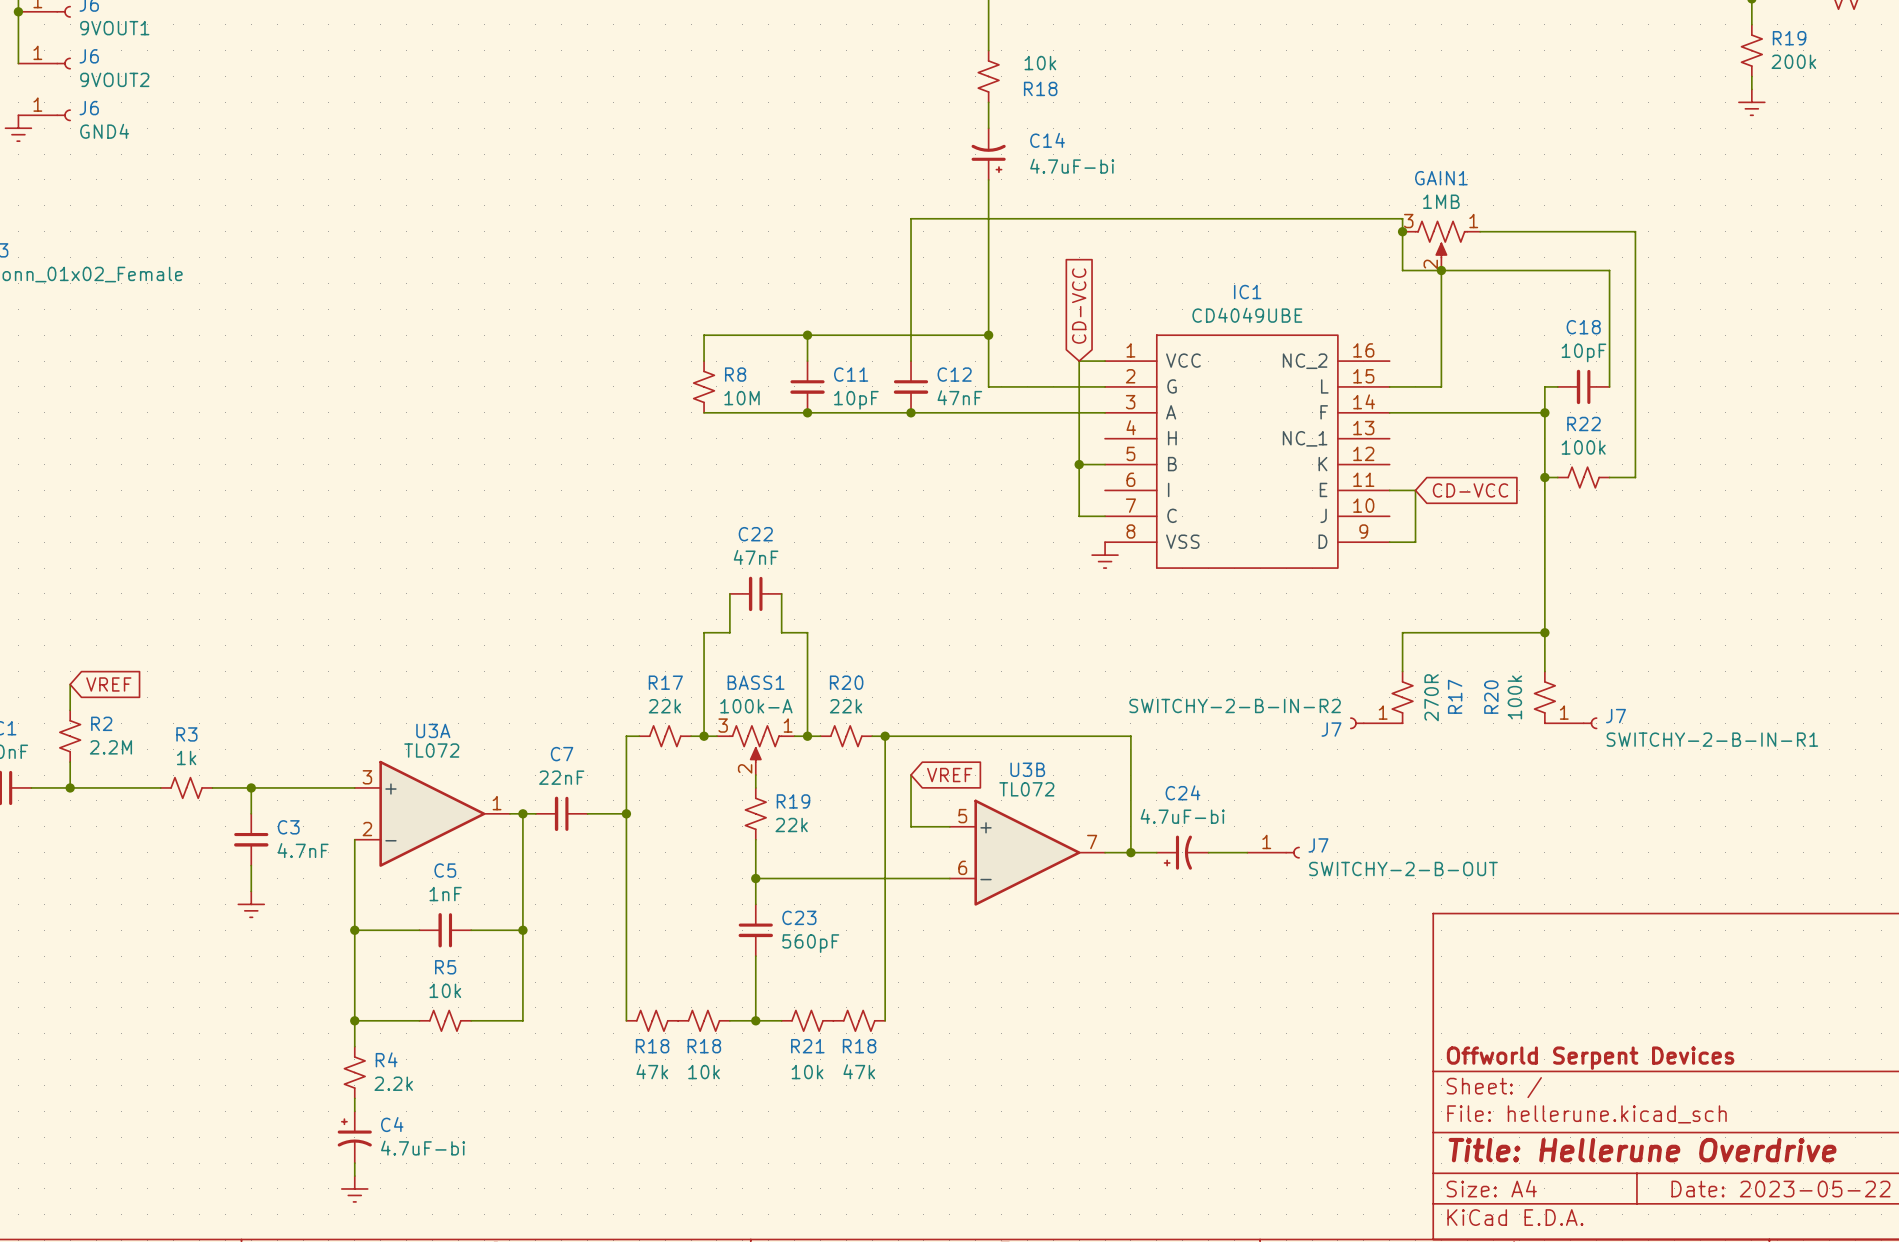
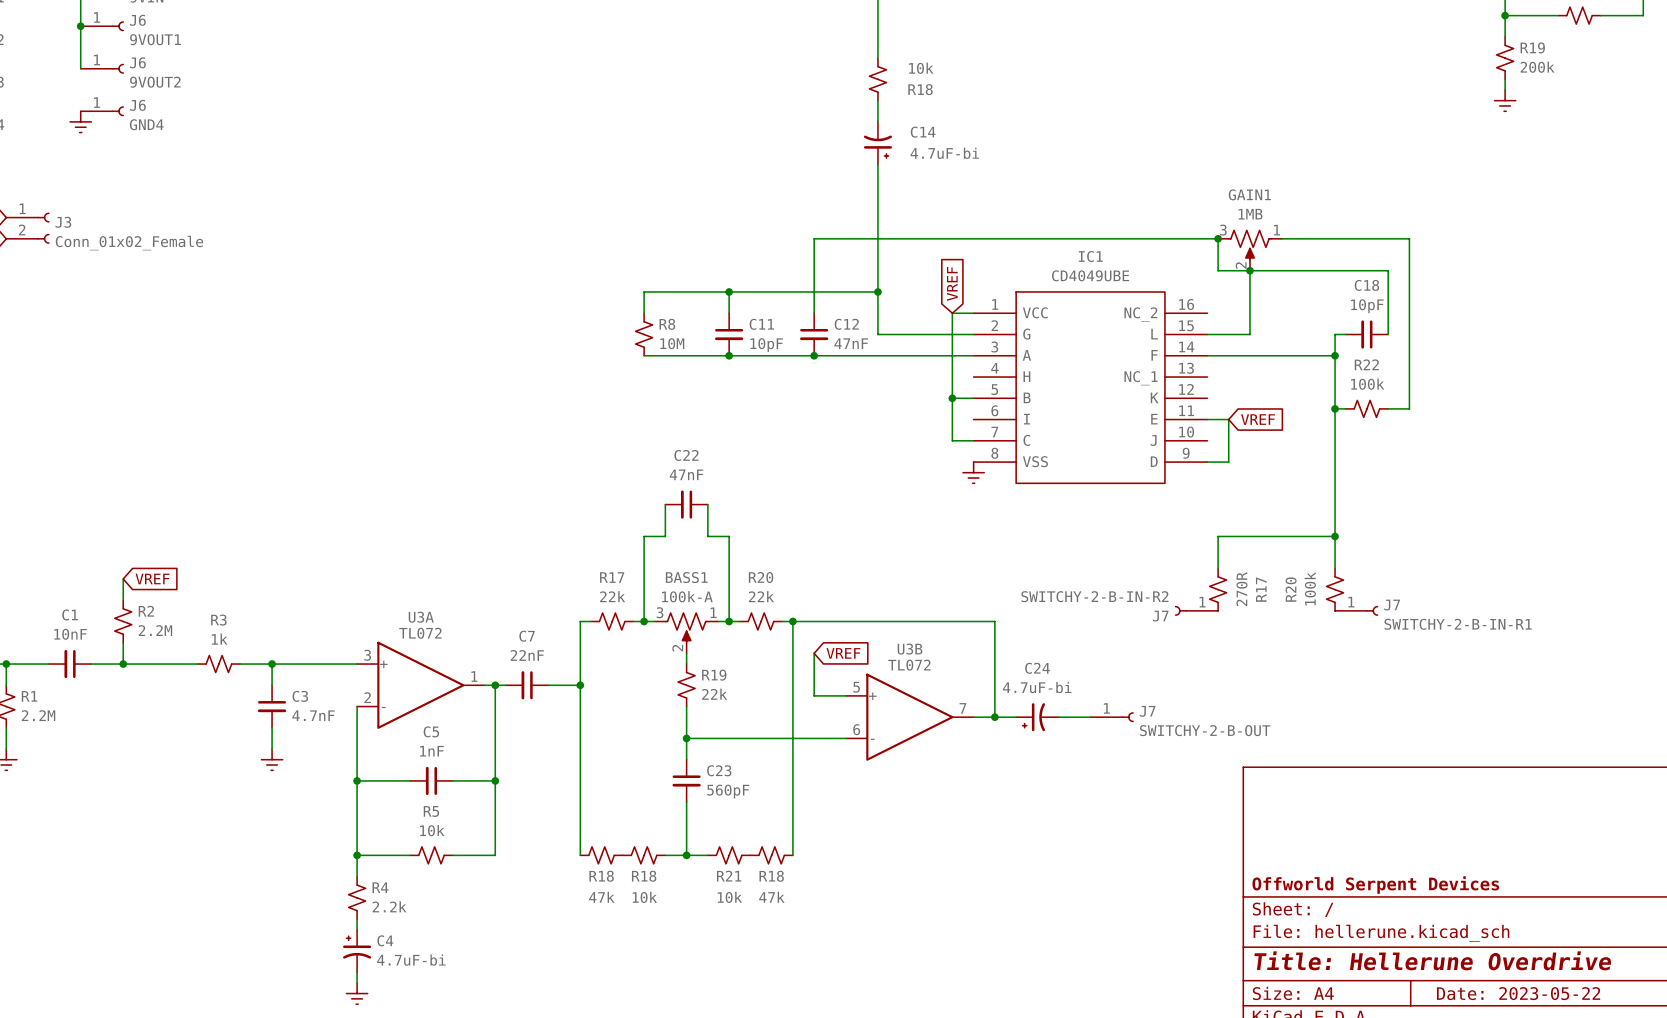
junction: (1402, 231) -> none
wire: (1480, 231) (1635, 231) (1635, 270) -> none
GAIN1 position: (1441, 245) -> (1249, 250)
wire: (911, 270) (911, 218) (1402, 218) (1402, 270) (1480, 270) -> (814, 238) (1218, 238) (1218, 270) (1388, 270)
junction: none -> (1218, 238)
junction: (1441, 270) -> none
wire: (1609, 270) (1609, 309) -> (1388, 238) (1409, 238)
global label: CD-VCC (1079, 306) -> VREF (952, 283)
junction: none -> (1249, 270)
global label: CD-VCC (1470, 490) -> VREF (1258, 419)

